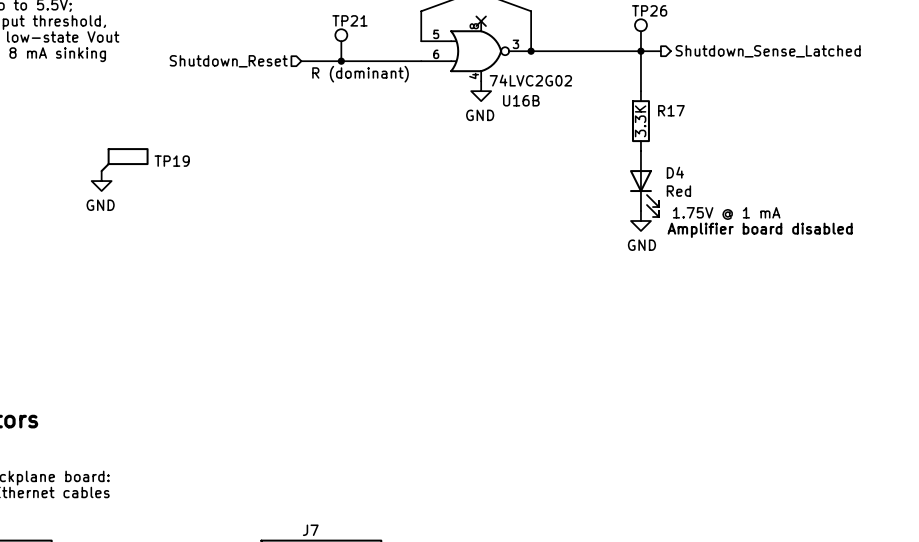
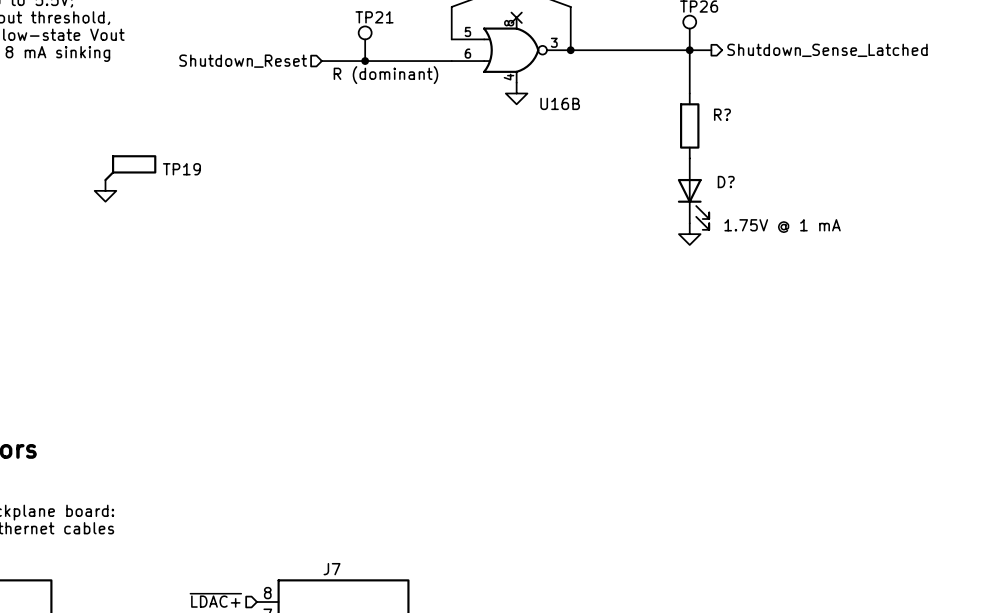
U16B value: 74LVC2G02 (530, 80) -> none
R17 name: R17 (671, 110) -> R? (722, 114)
power symbol text: GND (480, 115) -> none
R17 value: 3.3K (640, 121) -> none
D4 name: D4 (675, 172) -> D? (726, 182)
D4 value: Red (678, 191) -> none
power symbol text: GND (100, 205) -> none
text: Amplifier board disabled (760, 230) -> none
power symbol text: GND (641, 245) -> none

